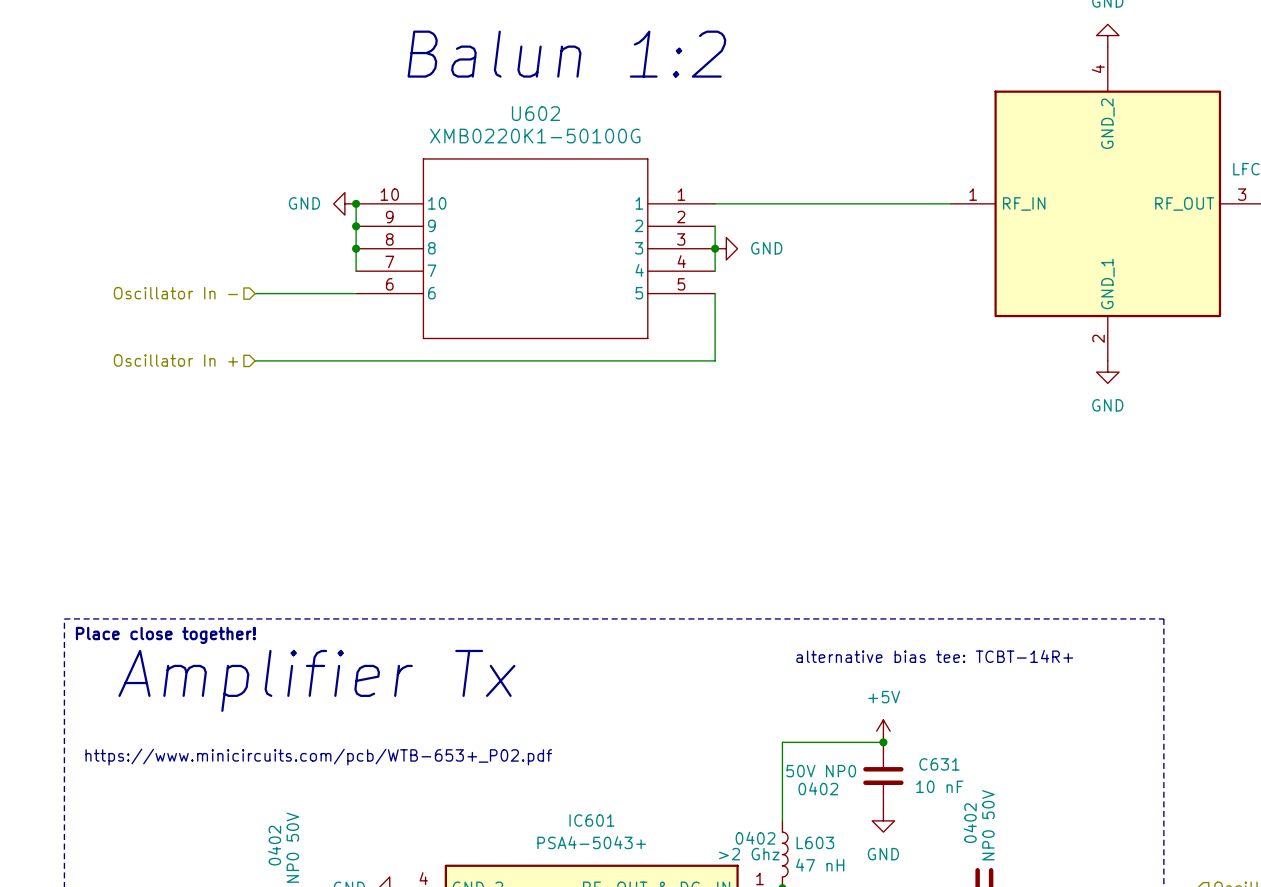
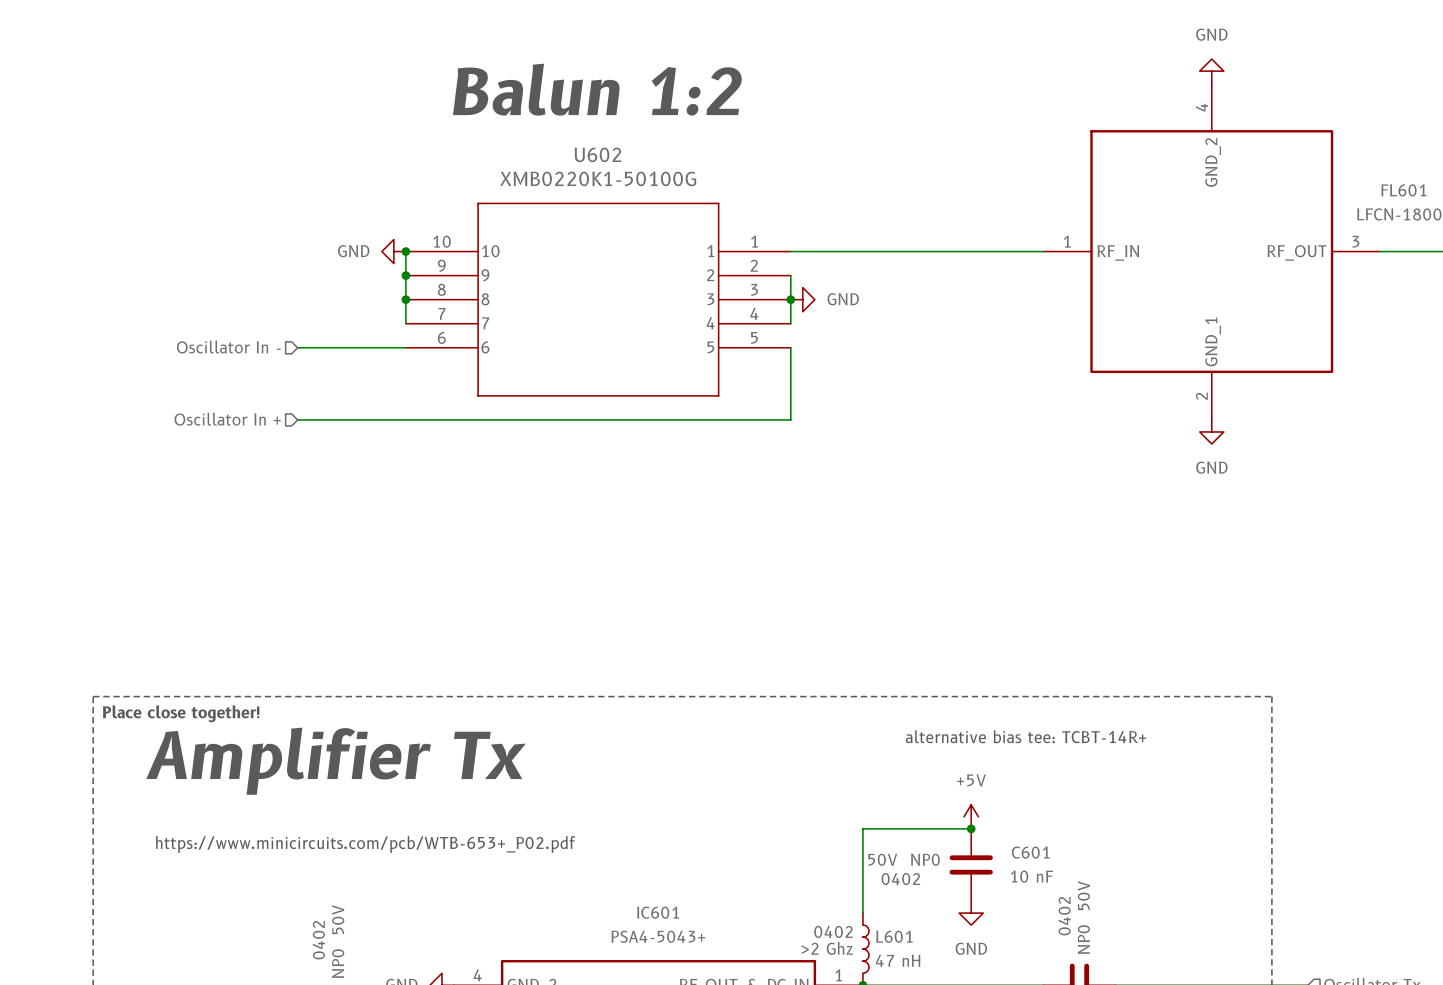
C631 name: C631 (939, 764) -> C601 (1030, 852)
L603 name: L603 (815, 842) -> L601 (894, 936)

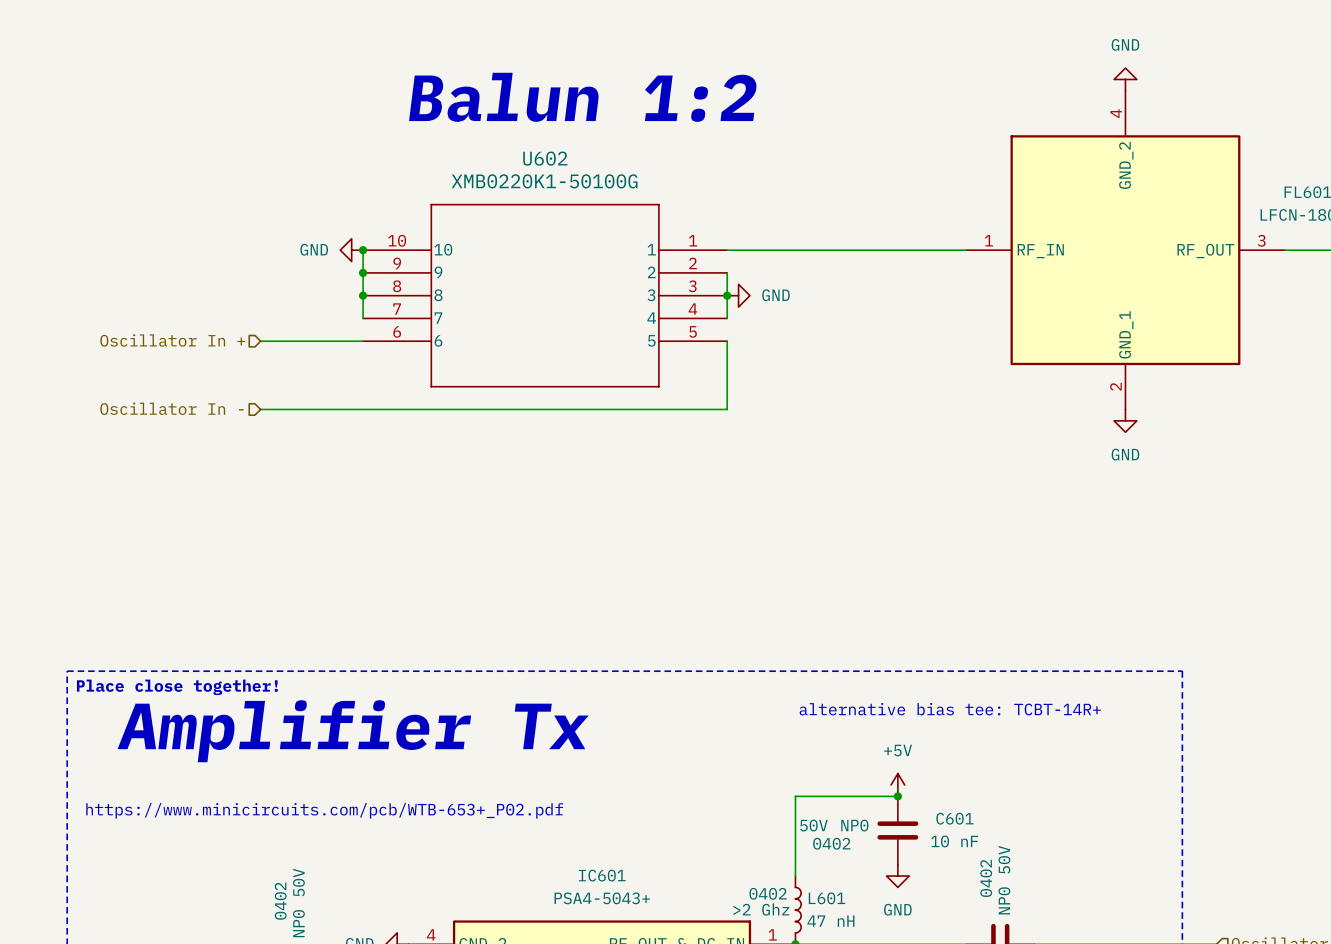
hierarchical label: Oscillator In - (228, 347) -> Oscillator In + (172, 340)
hierarchical label: Oscillator In + (227, 419) -> Oscillator In - (172, 408)

